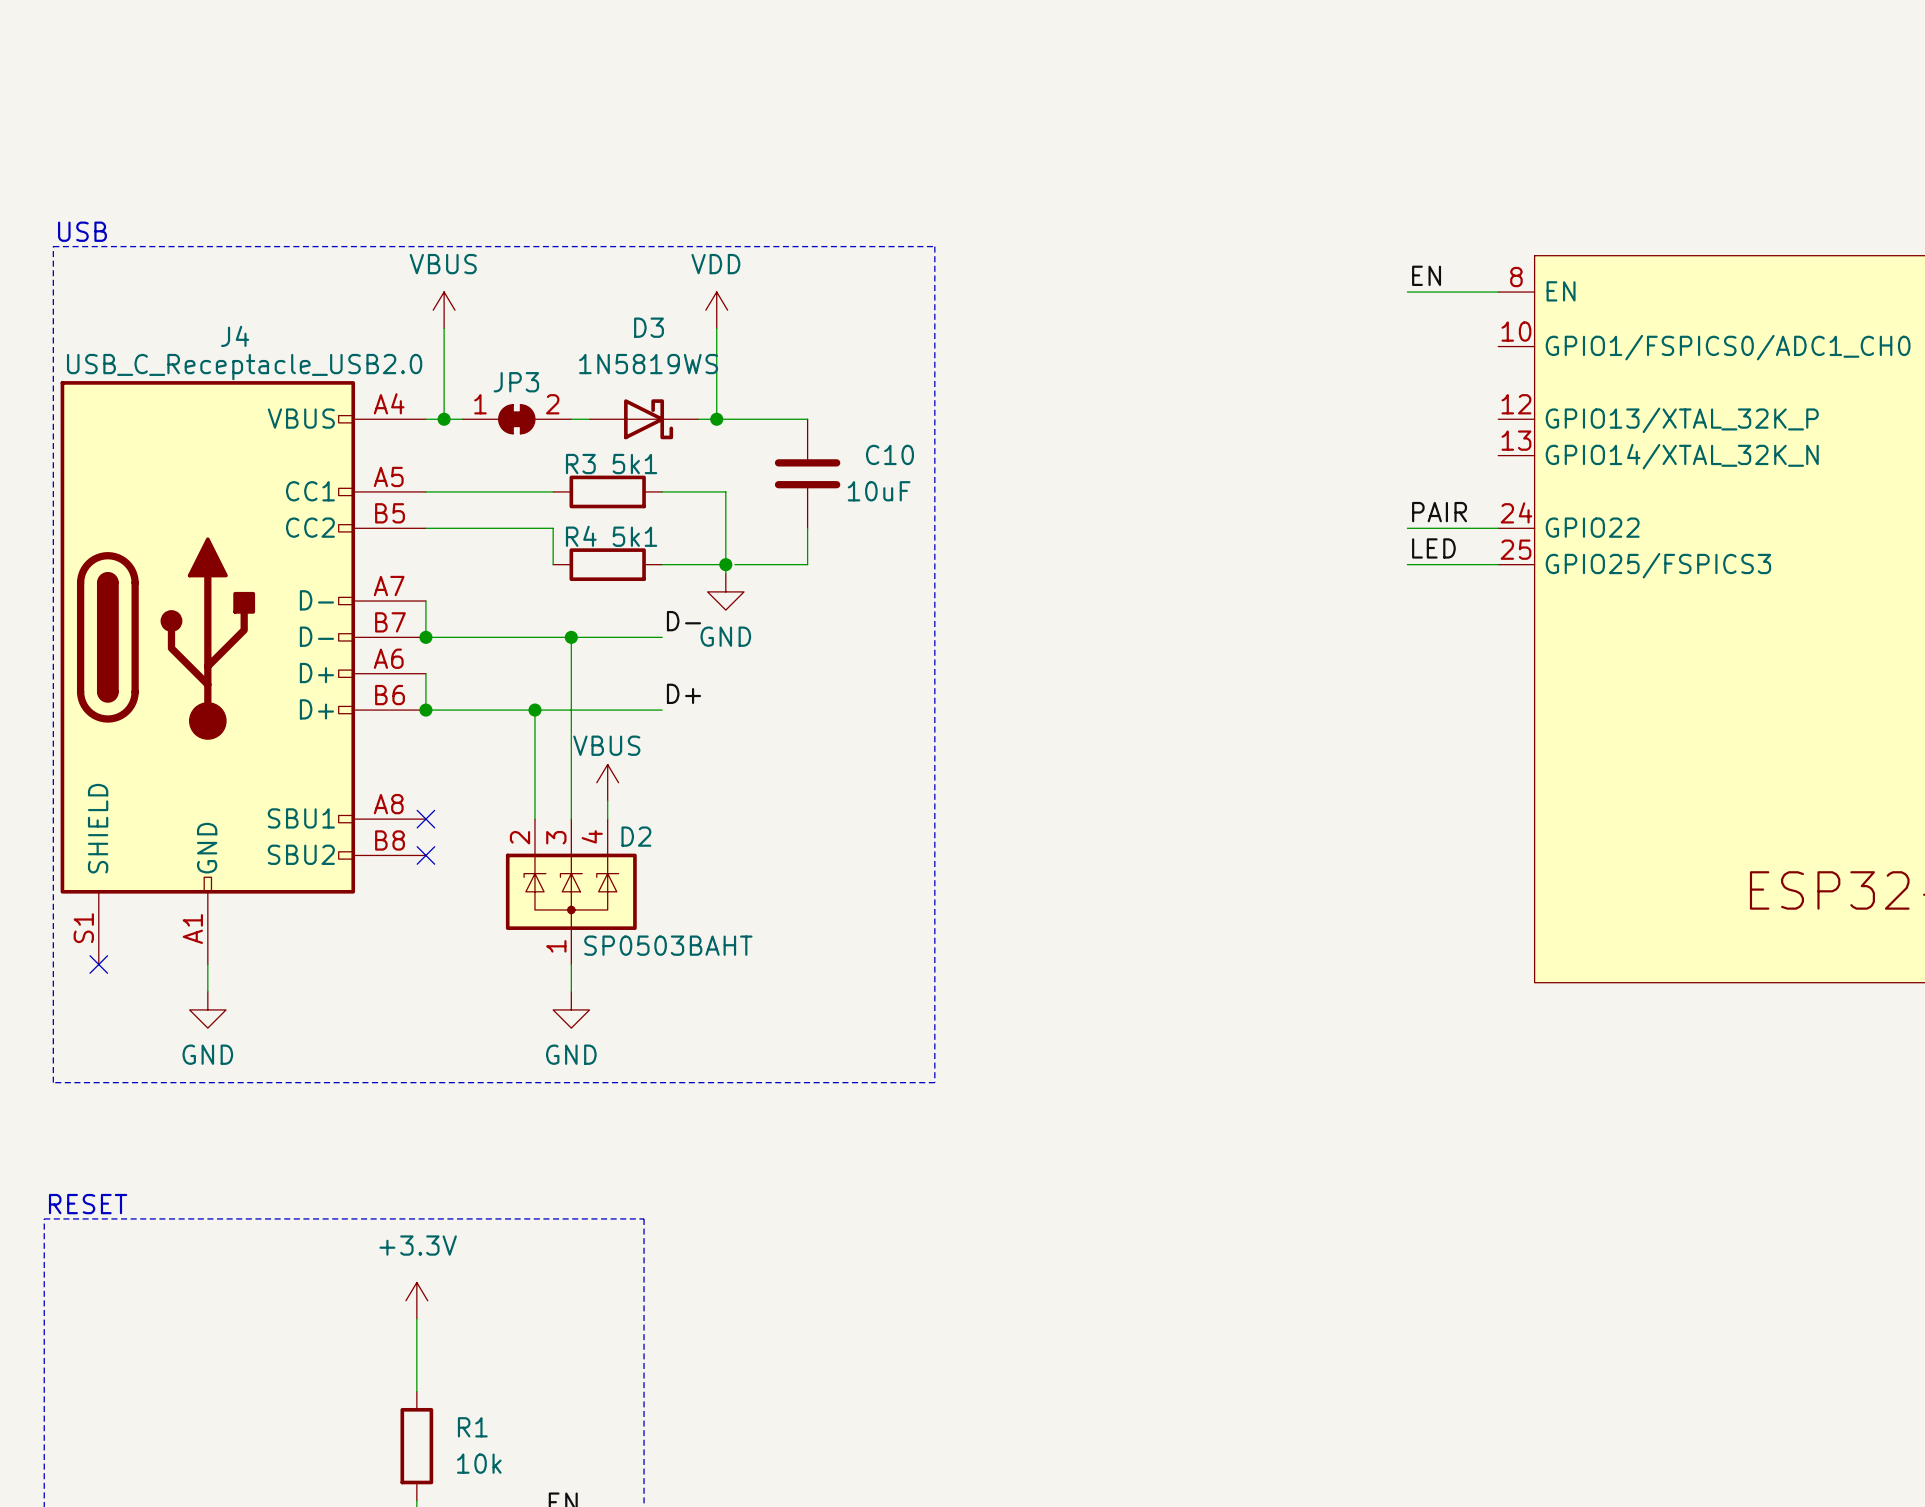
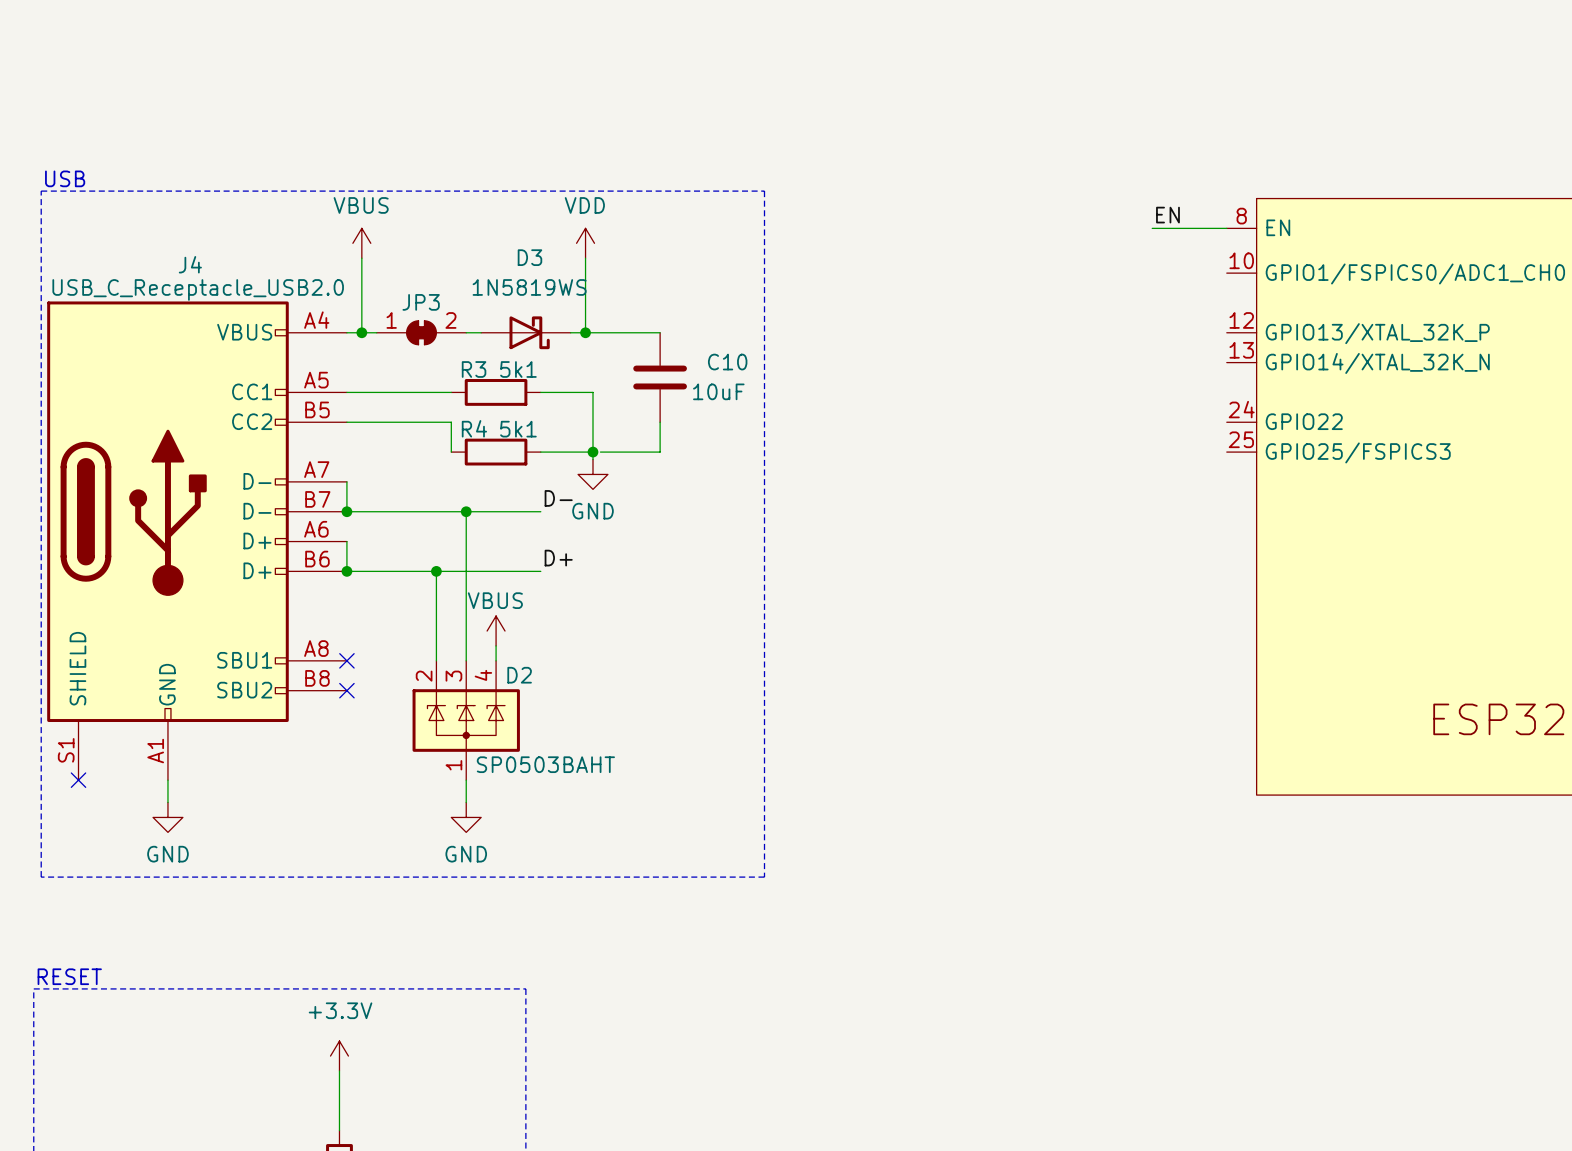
label: PAIR (1439, 512) -> none
wire: (1407, 528) (1498, 528) -> none
label: LED (1433, 548) -> none
wire: (1407, 564) (1498, 564) -> none

